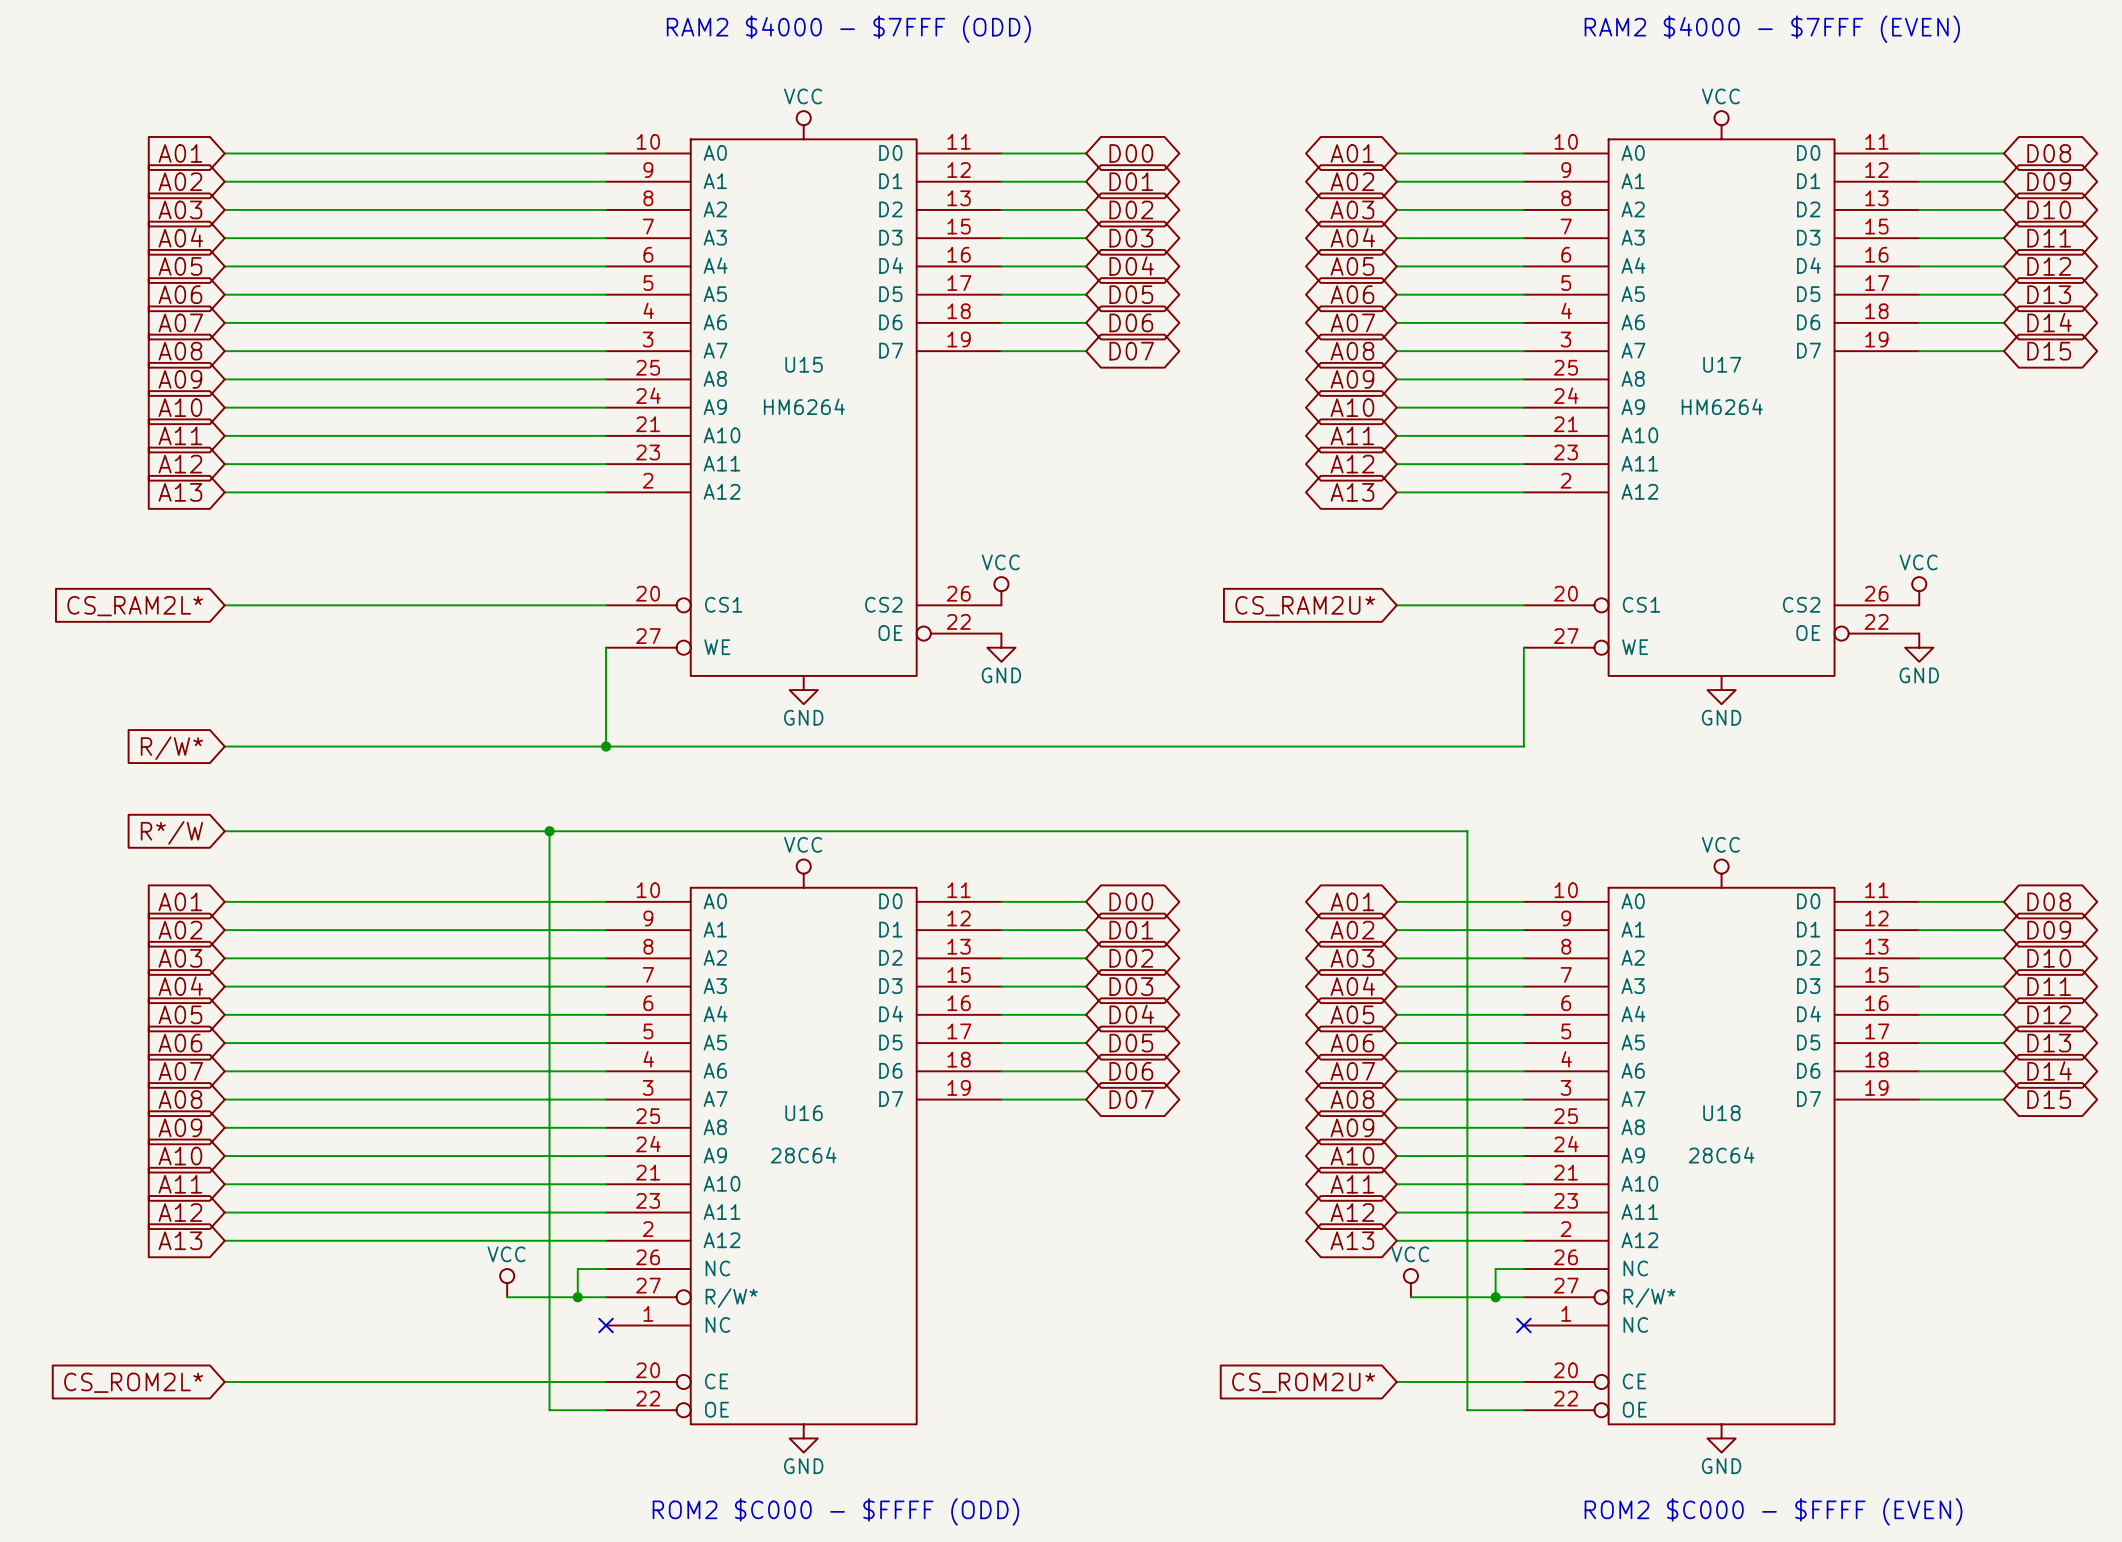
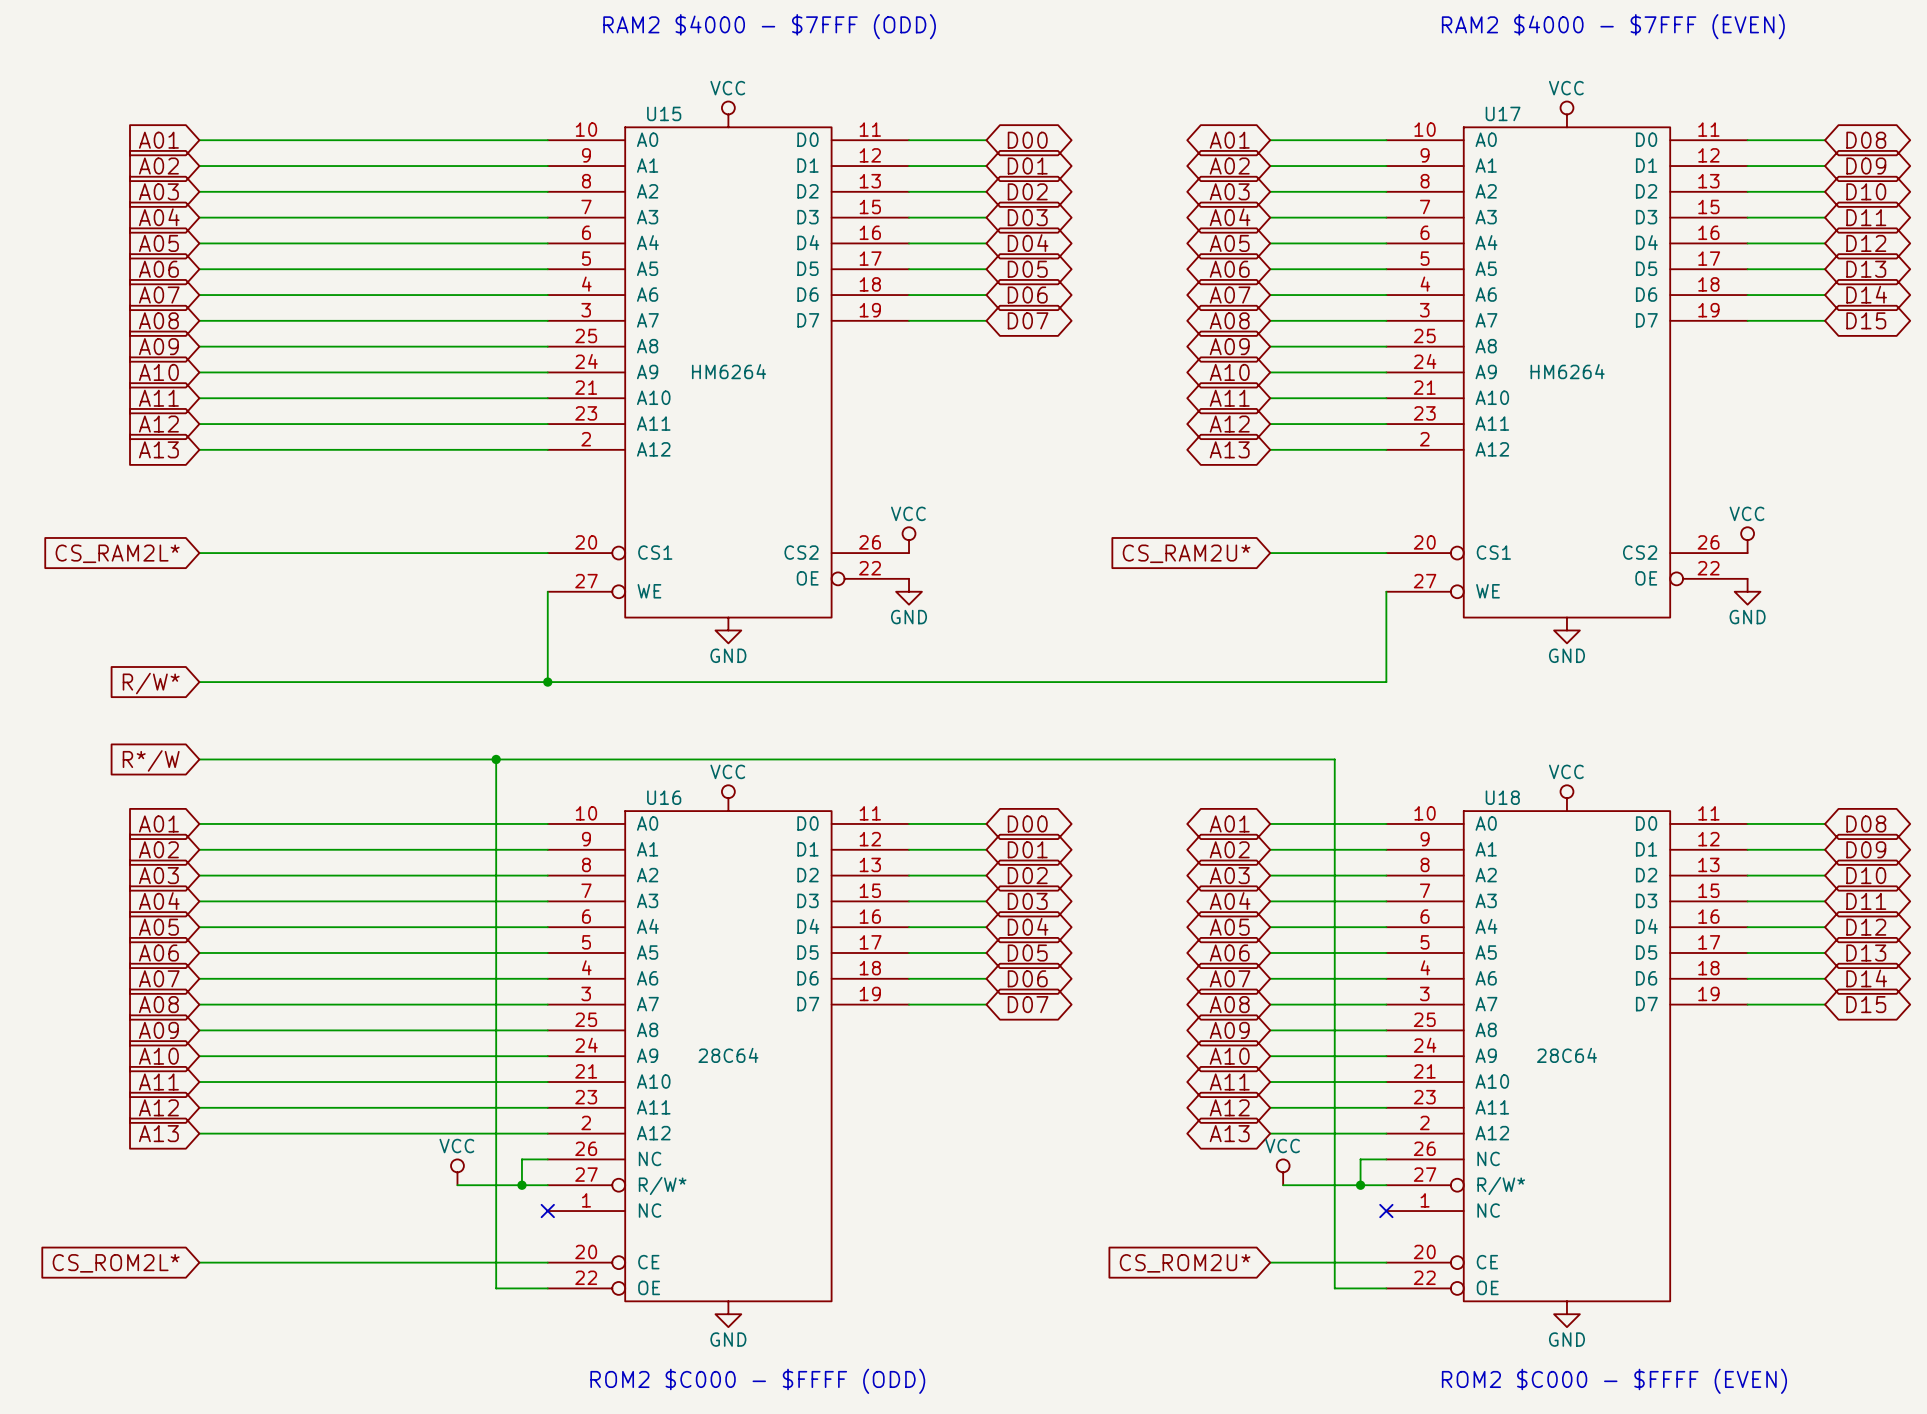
U15 name position: U15 (804, 364) -> U15 (664, 113)
U17 name position: U17 (1722, 364) -> U17 (1503, 113)
U16 name position: U16 (804, 1113) -> U16 (664, 797)
U18 name position: U18 (1721, 1113) -> U18 (1502, 797)

